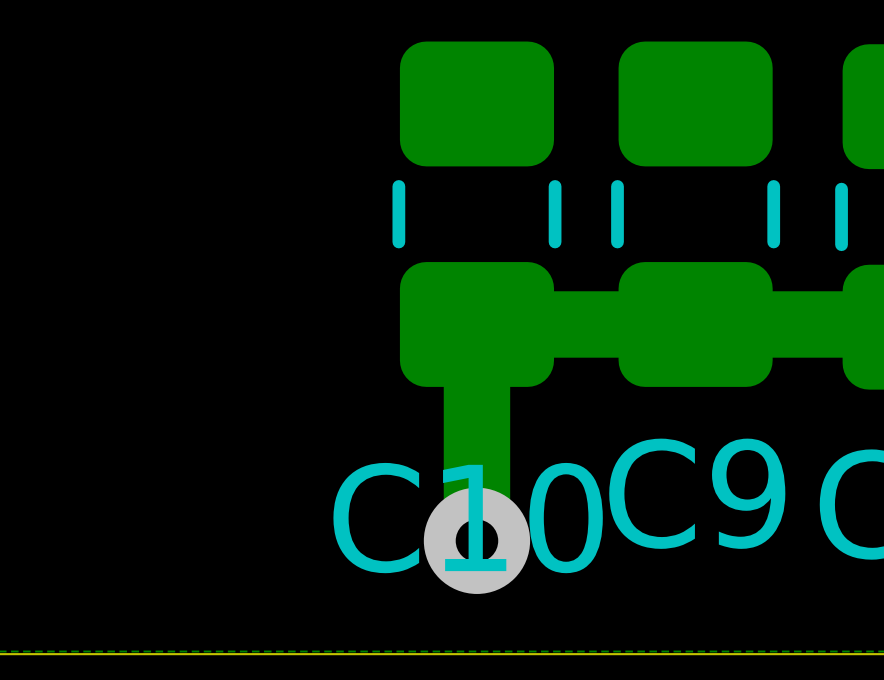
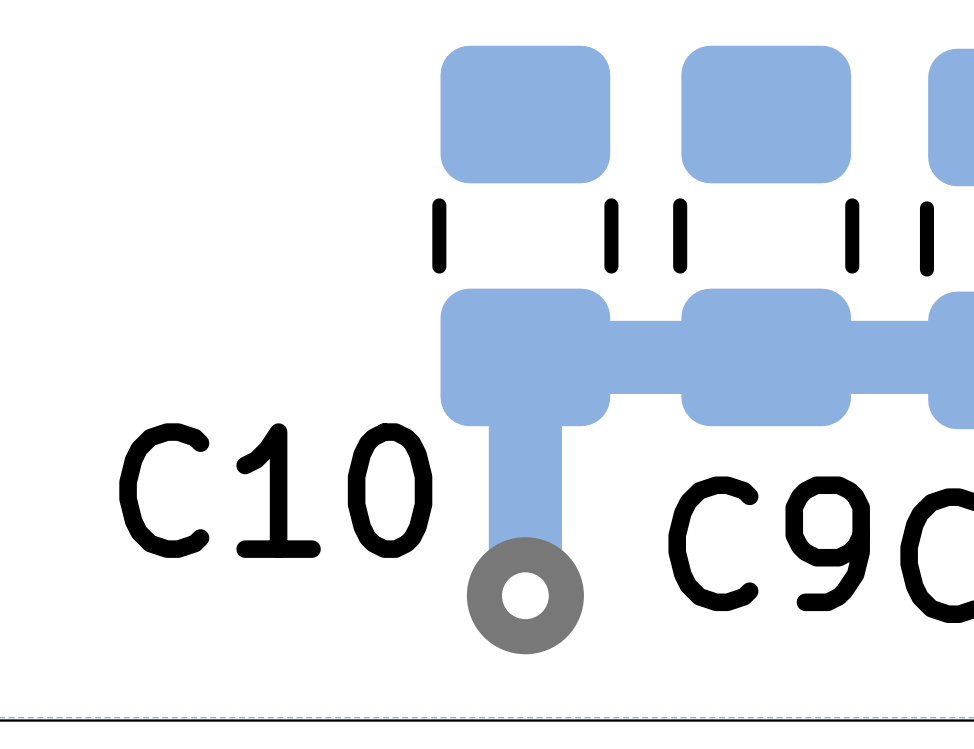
C10 name position: C10 (468, 518) -> C10 (275, 490)

